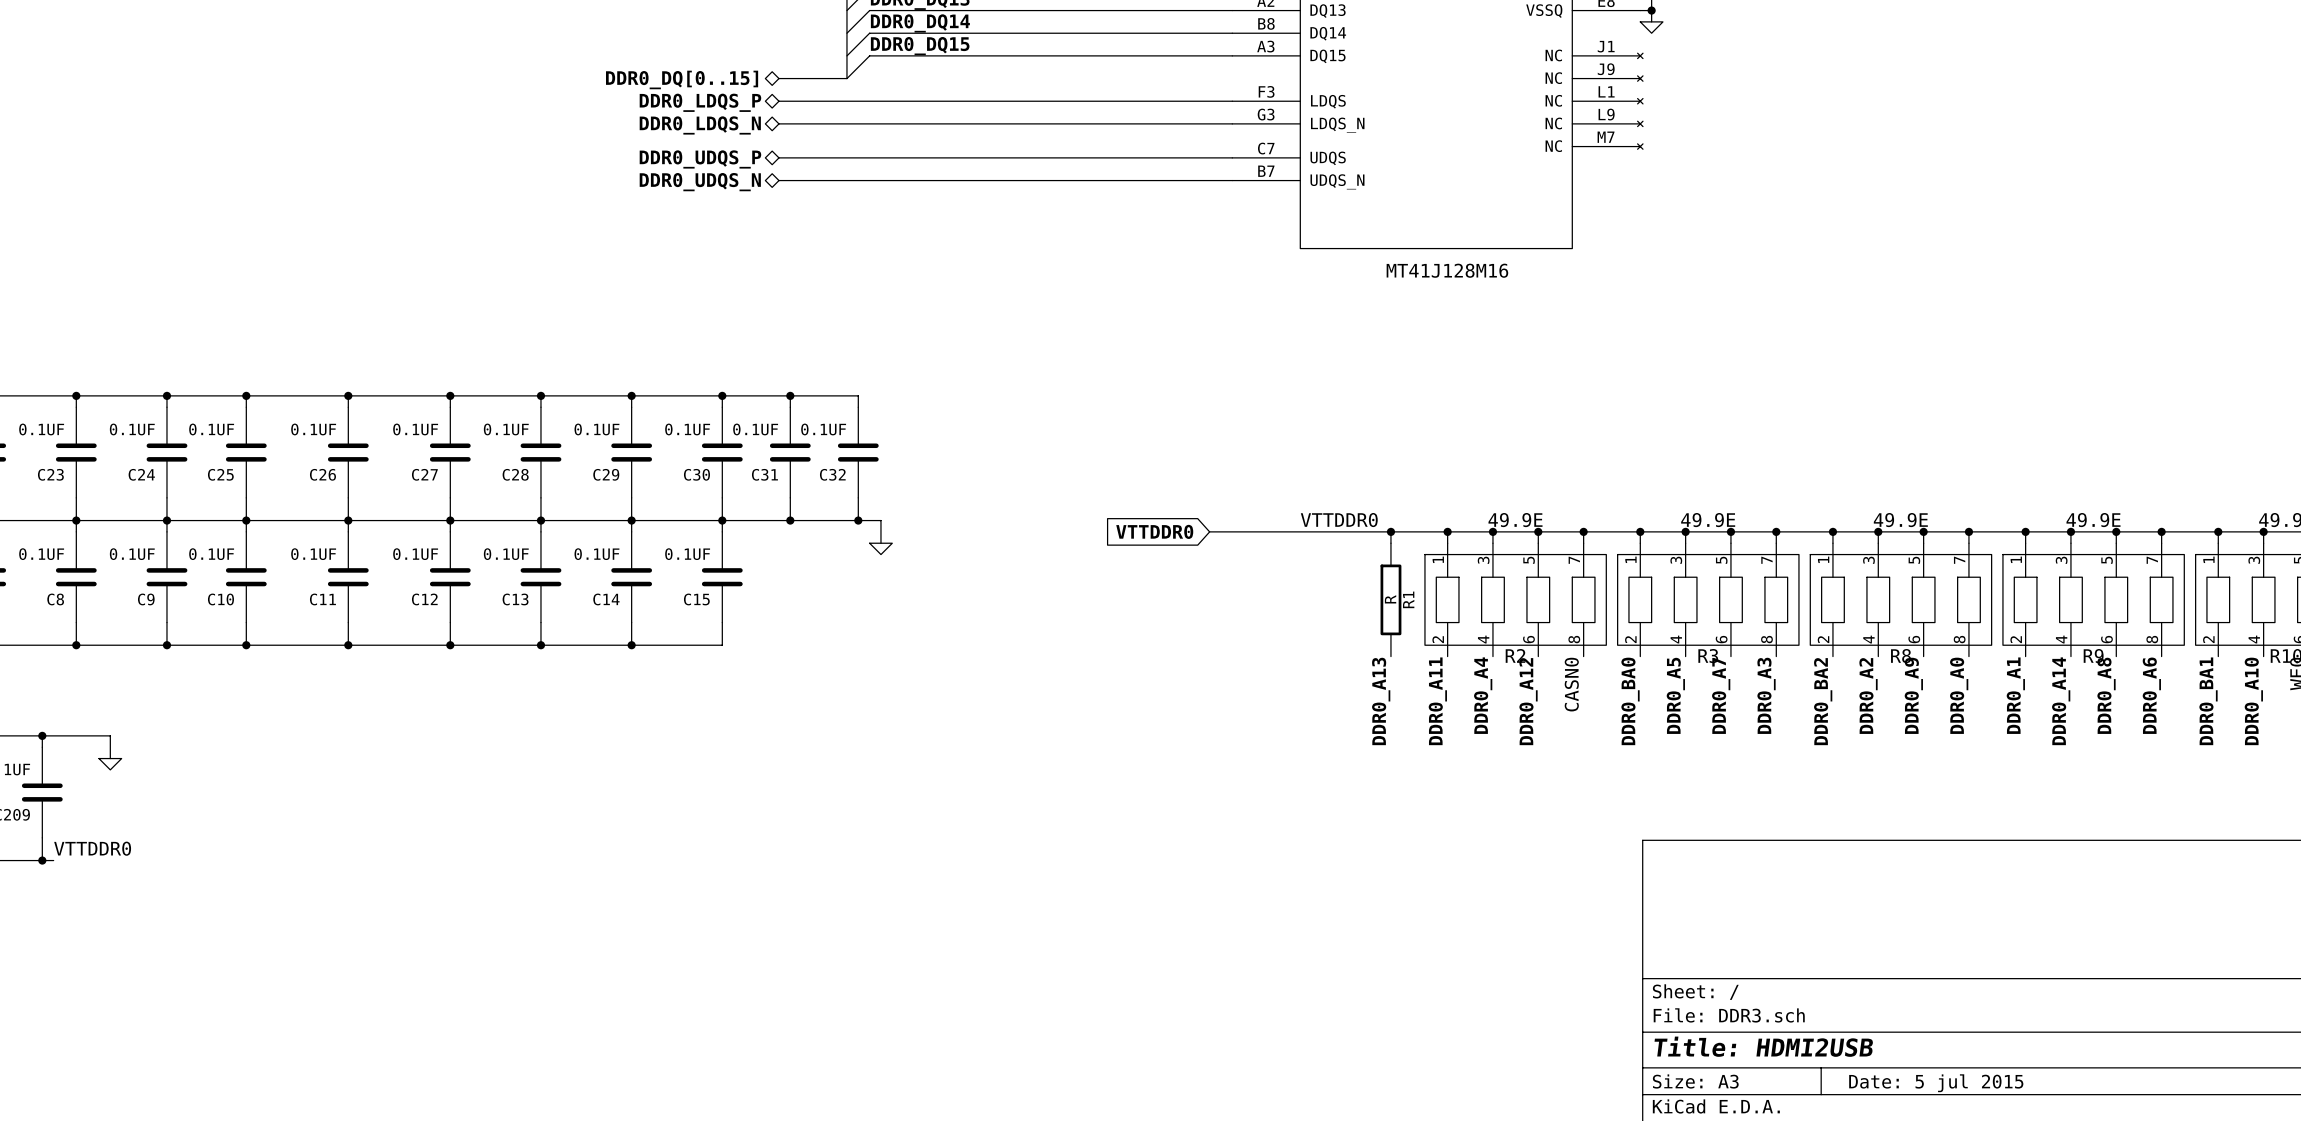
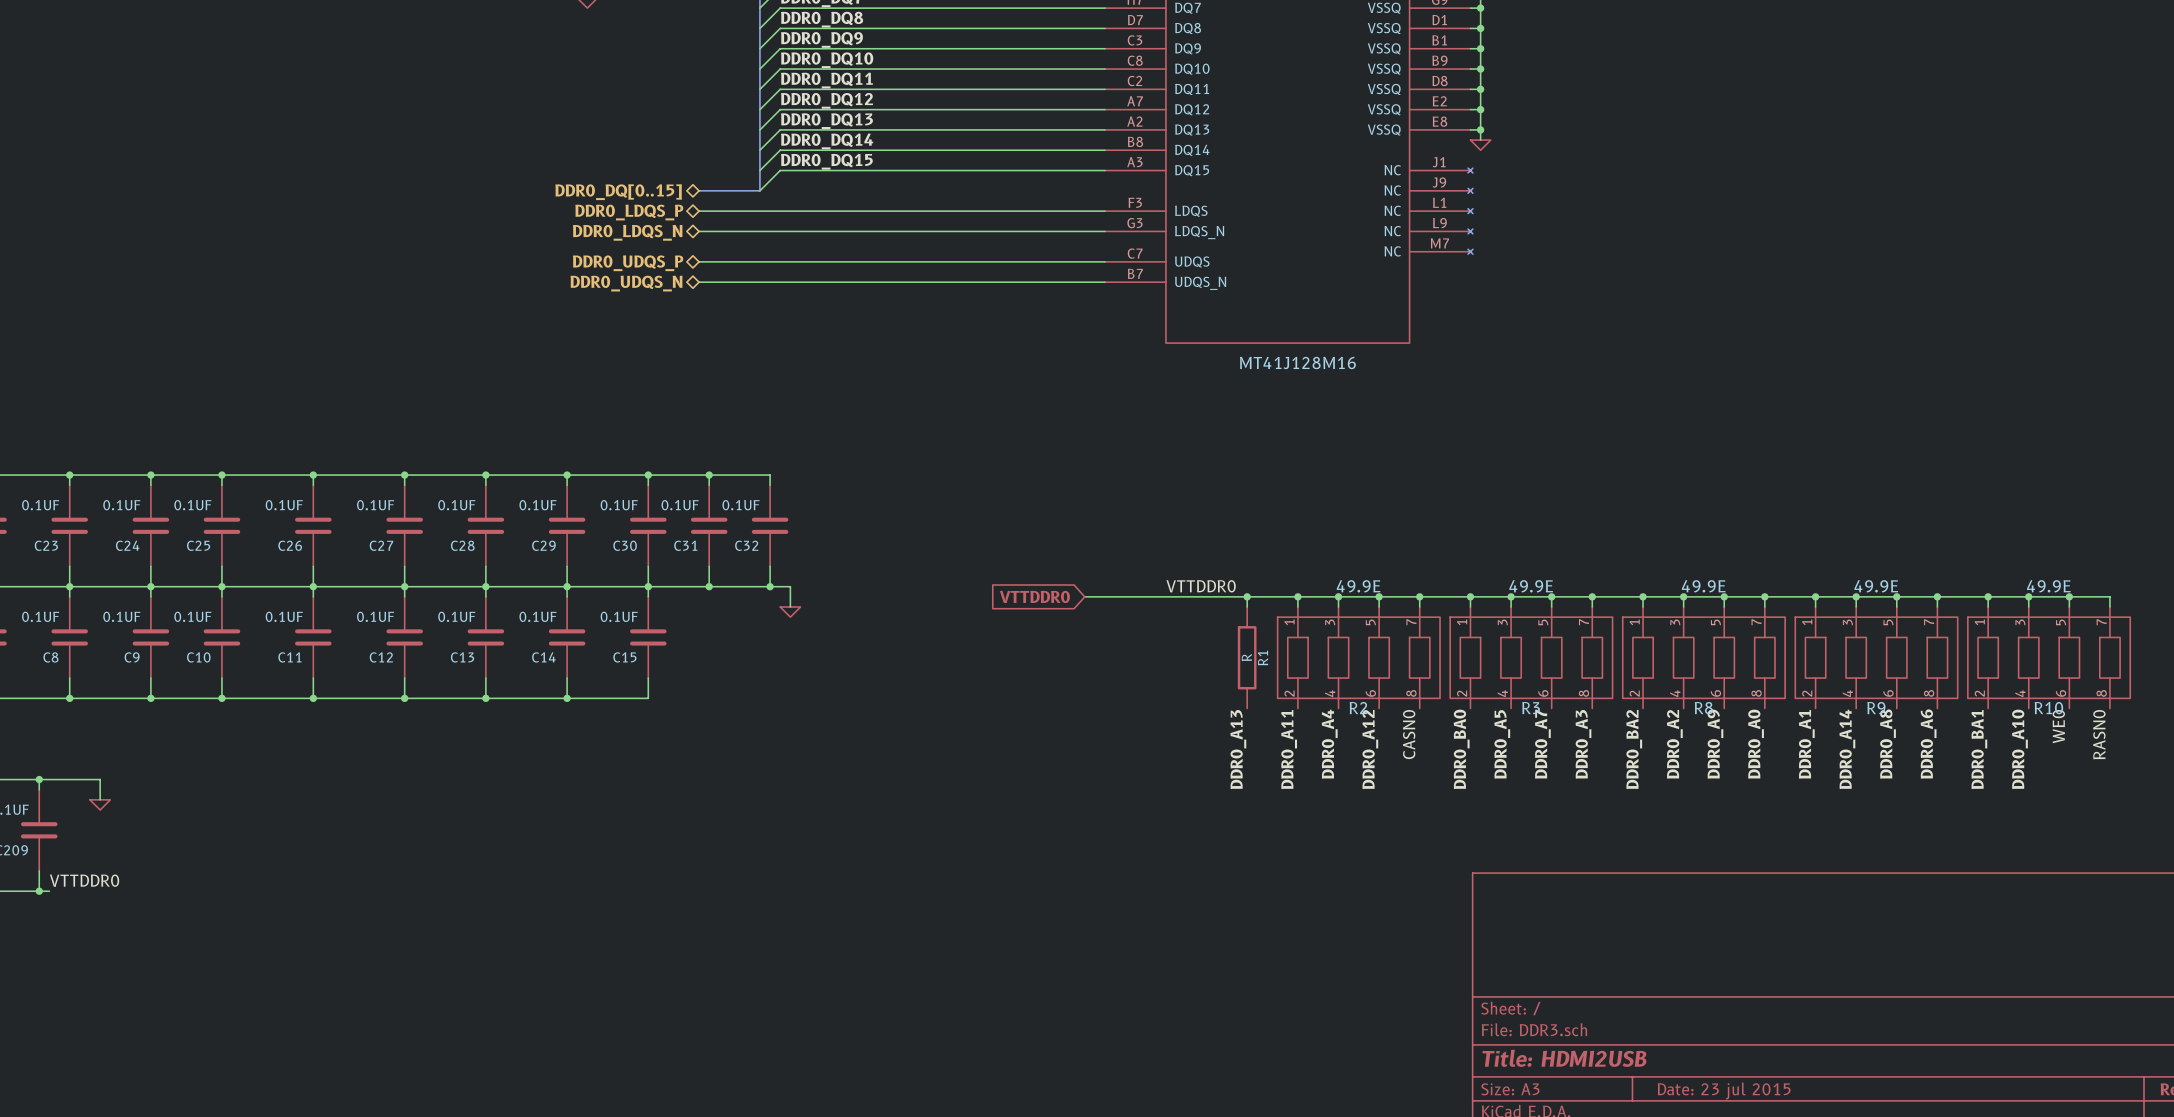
title block: Date: 5 jul 2015 (1936, 1083) -> Date: 23 jul 2015 (1724, 1090)

